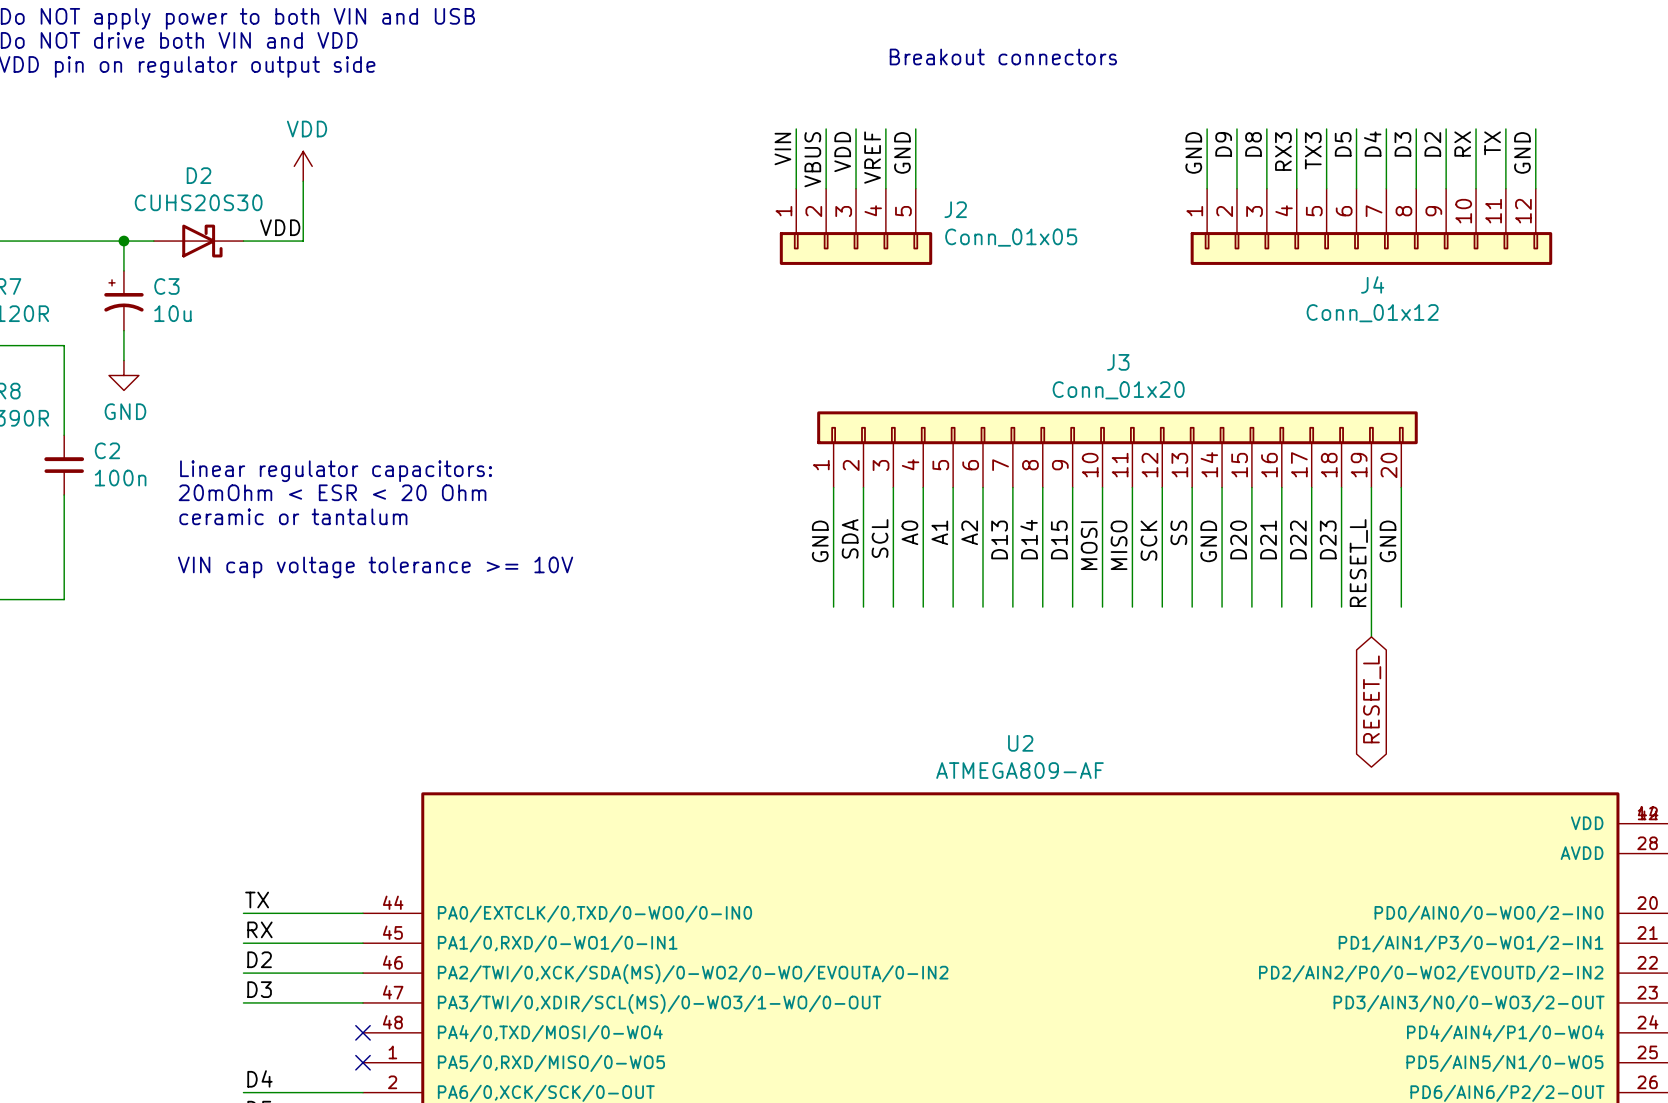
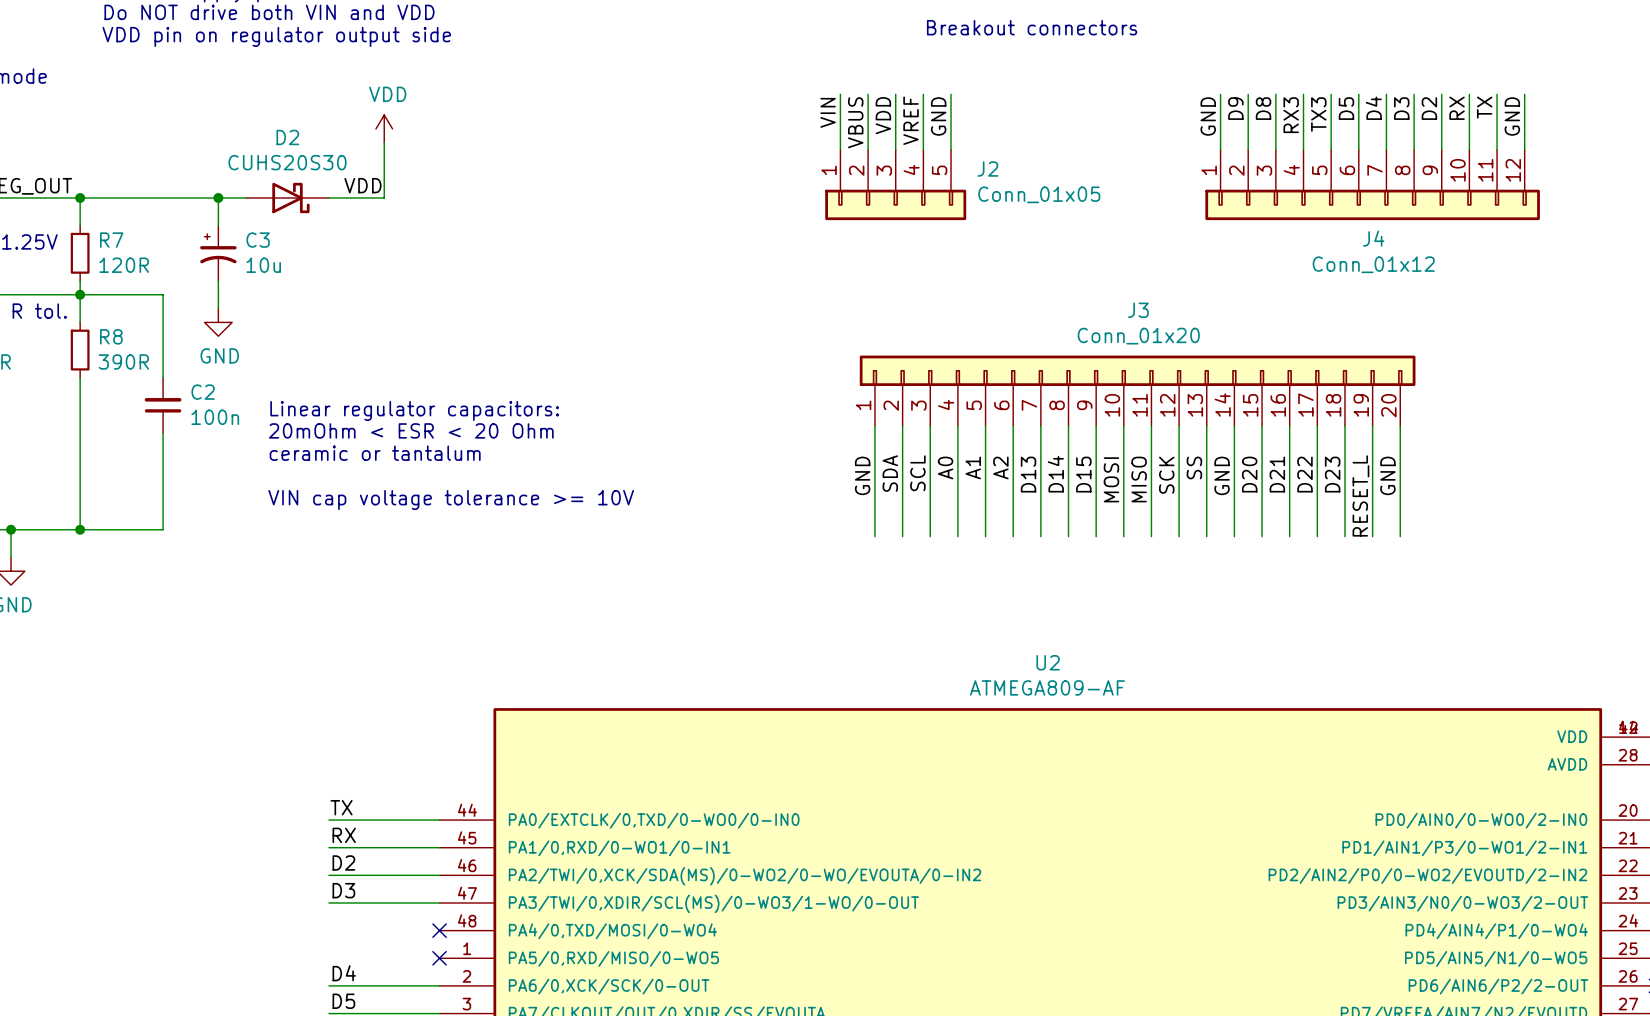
wire: (1371, 607) (1371, 636) -> none
global label: RESET_L (1372, 699) -> none

